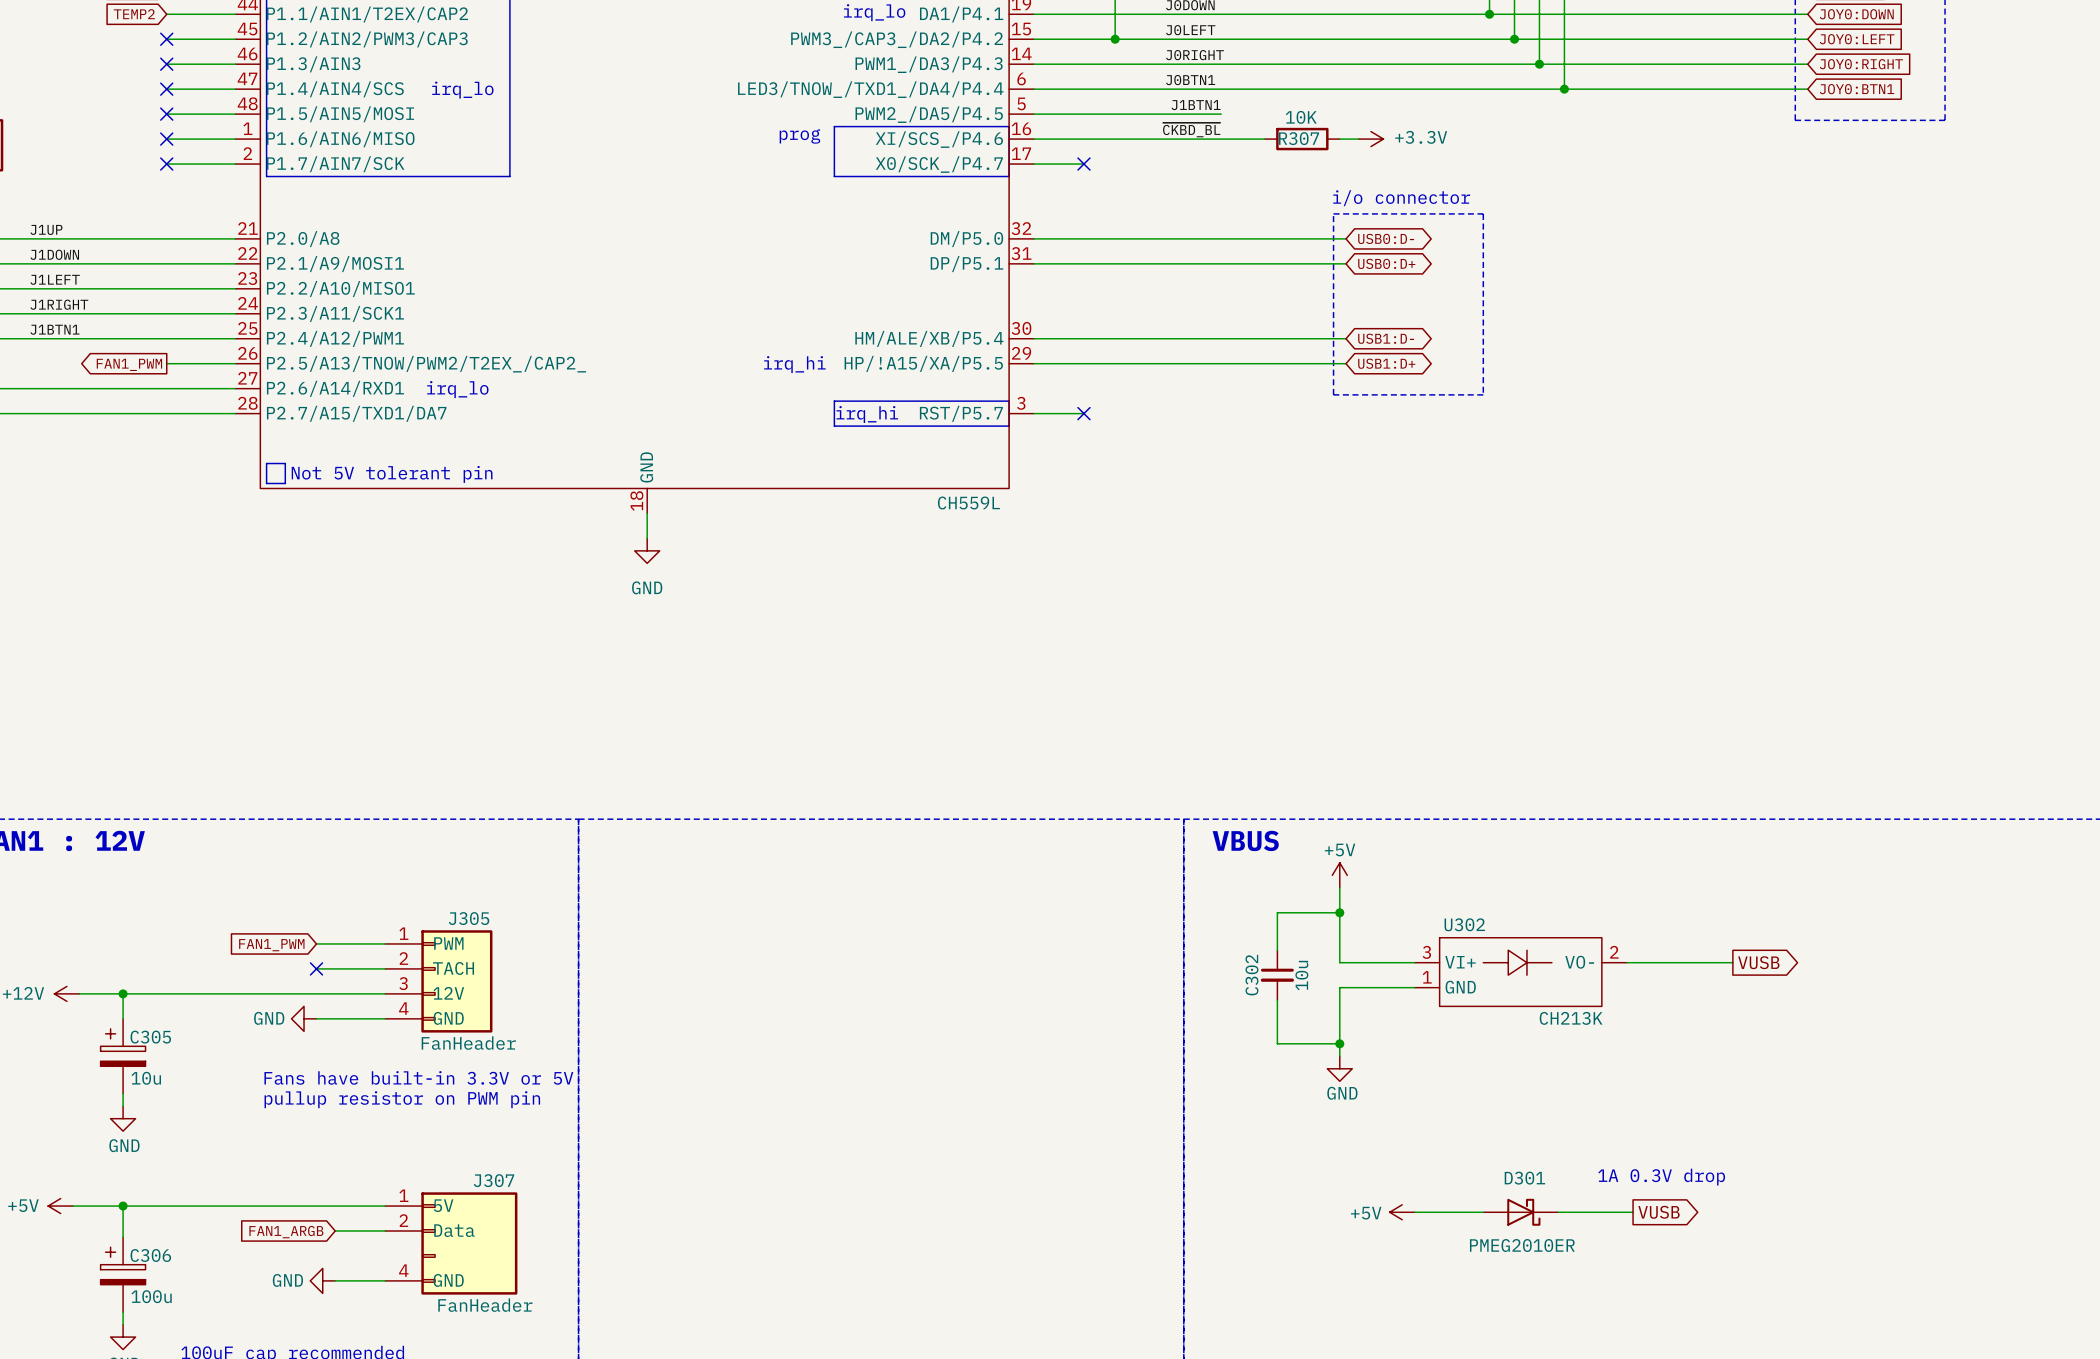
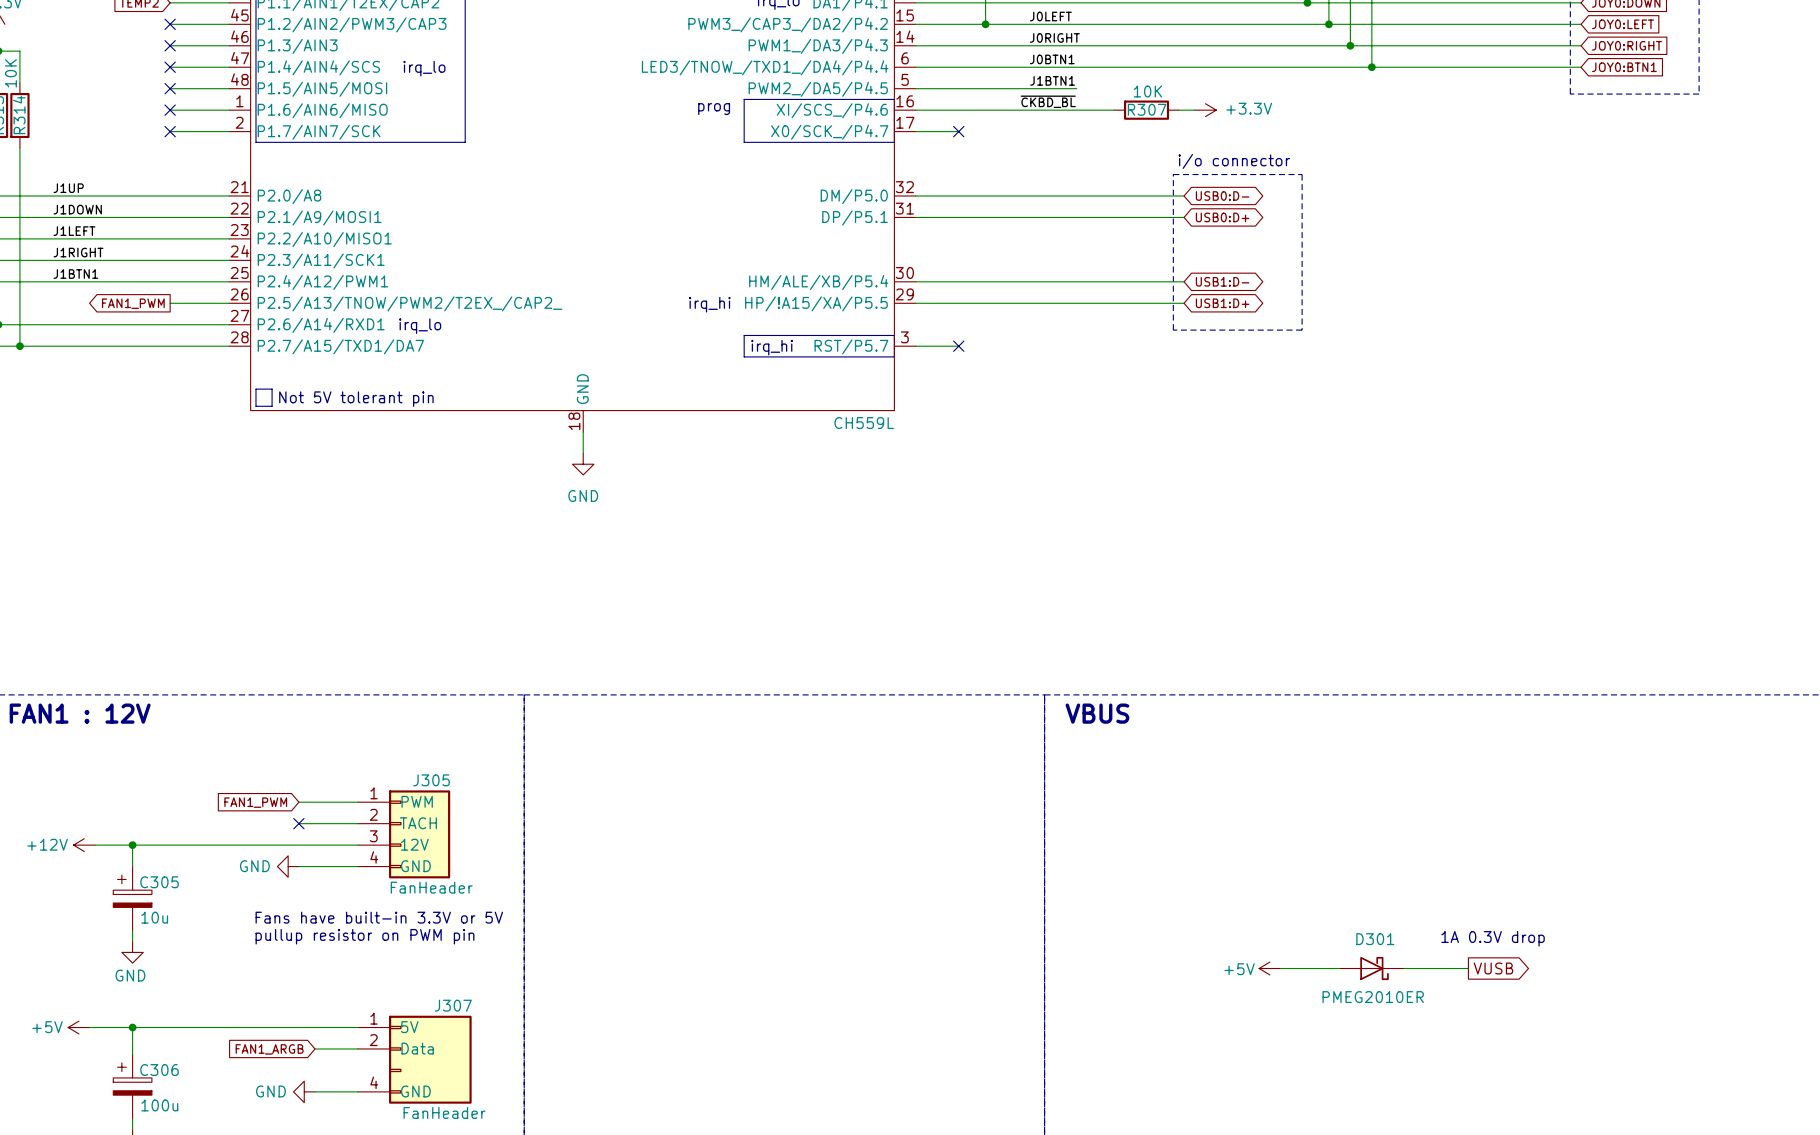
power symbol: +5V (1339, 875) -> none
wire: (1339, 887) (1339, 962) (1414, 962) -> none
wire: (1339, 912) (1277, 912) (1277, 950) -> none
junction: (1339, 912) -> none
wire: (1626, 962) (1732, 962) -> none
global label: VUSB (1758, 962) -> none
U302: CH213K (1520, 972) -> none
C302: 10u (1277, 975) -> none
wire: (1414, 987) (1339, 987) (1339, 1056) -> none
wire: (1277, 1000) (1277, 1043) (1339, 1043) -> none
junction: (1339, 1043) -> none
power symbol: GND (1339, 1068) -> none
text position: 1A 0.3V drop (1661, 1177) -> 1A 0.3V drop (1493, 938)
power symbol position: +5V (1402, 1212) -> +5V (1269, 968)
wire: (1414, 1212) (1483, 1212) -> (1280, 968) (1339, 968)
D301 position: (1520, 1212) -> (1371, 968)
wire: (1558, 1212) (1633, 1212) -> (1404, 968) (1468, 968)
global label position: VUSB (1658, 1212) -> VUSB (1493, 968)

